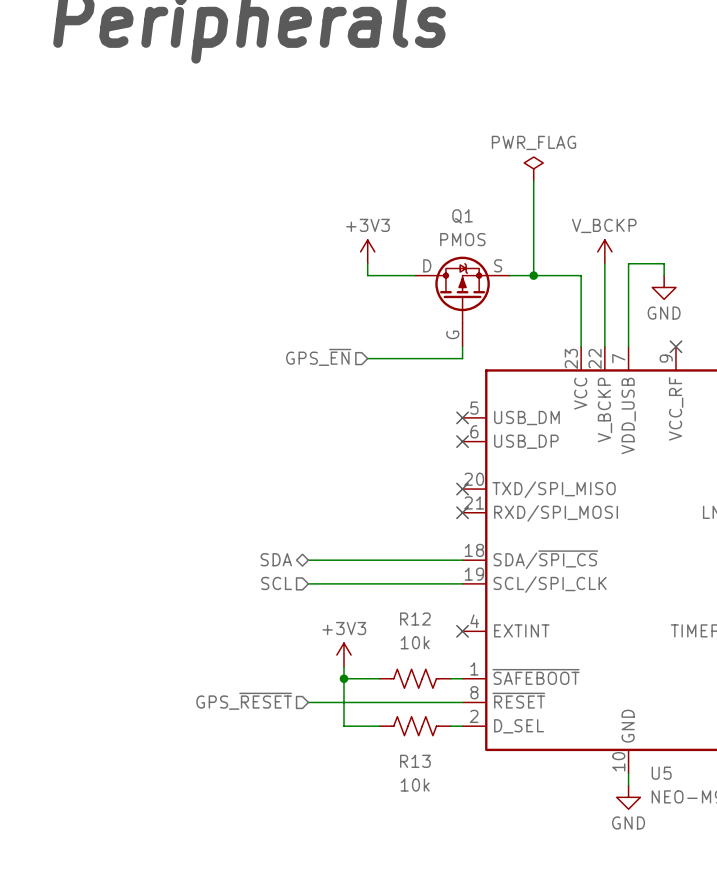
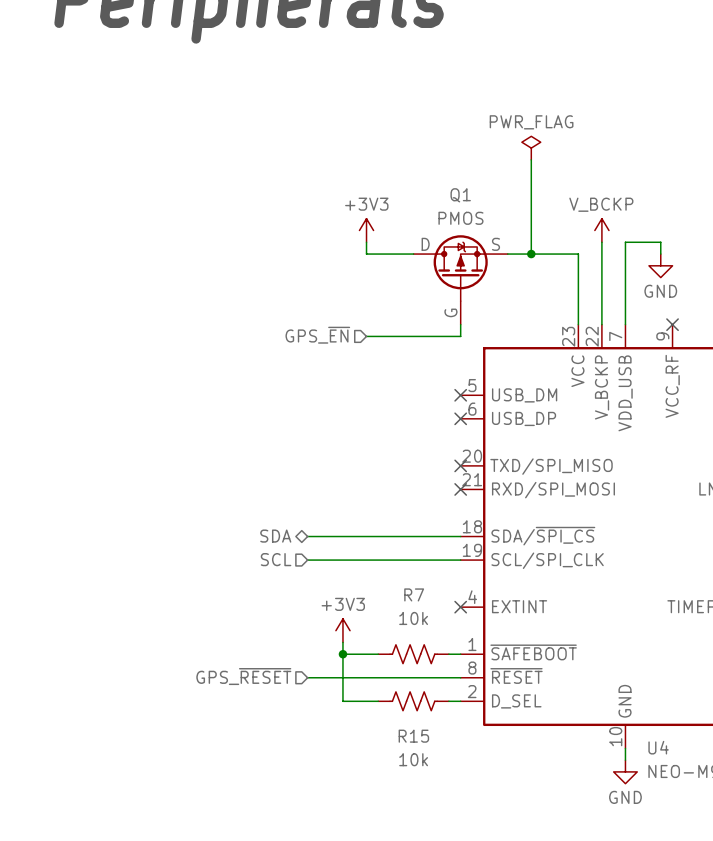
R12 name: R12 (415, 619) -> R7 (414, 594)
R13 name: R13 (415, 761) -> R15 (413, 736)
U5 name: U5 (661, 773) -> U4 (658, 747)

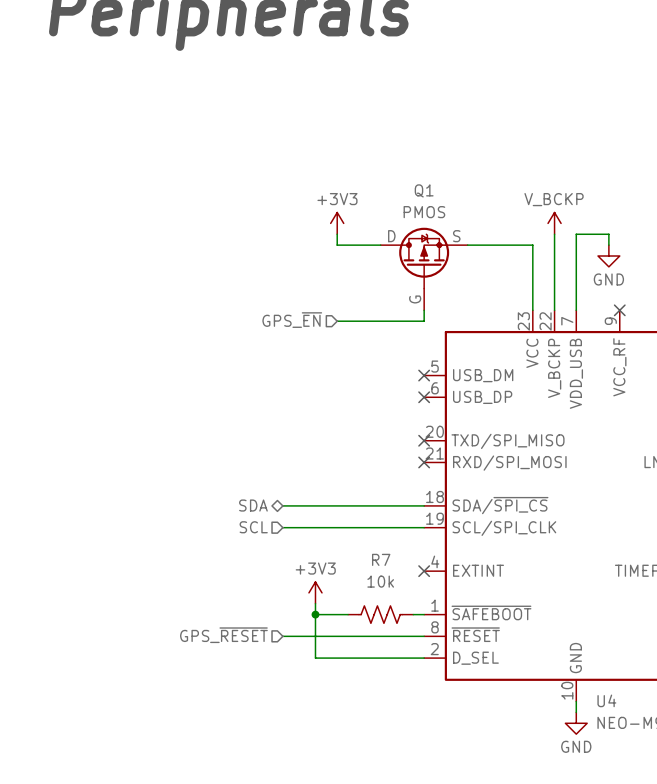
power symbol: PWR_FLAG (531, 148) -> none
wire: (531, 159) (531, 254) -> none
junction: (531, 254) -> none
R15: 10k (413, 701) -> none

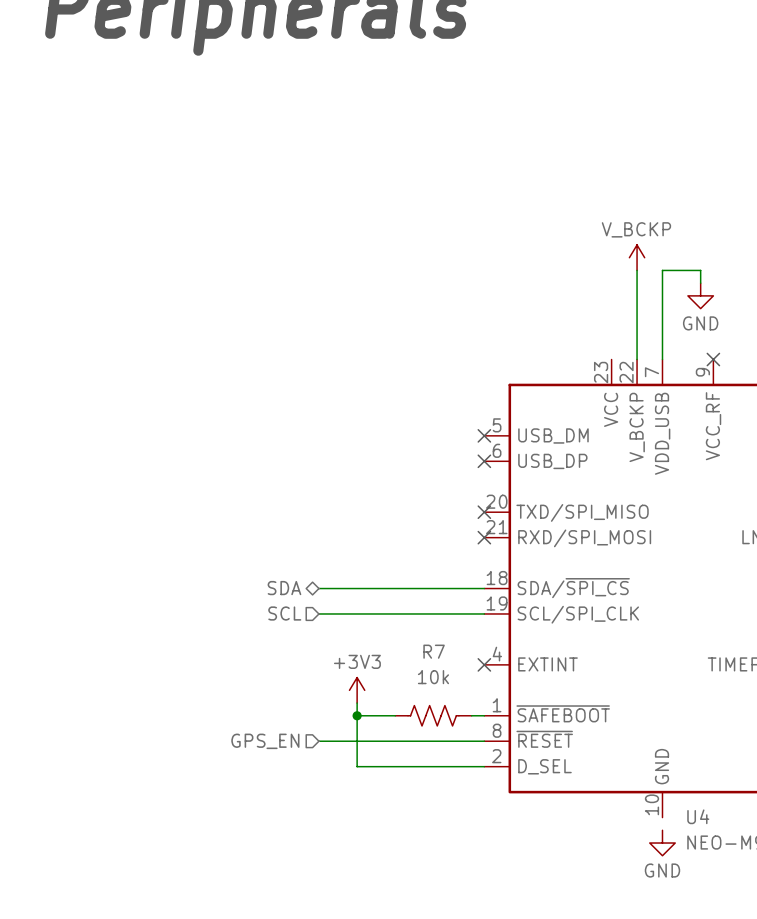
power symbol: +3V3 (337, 223) -> none
wire: (337, 234) (337, 245) (380, 245) -> none
wire: (467, 245) (532, 245) (532, 310) -> none
Q1: PMOS (424, 269) -> none
wire: (424, 310) (424, 321) (337, 321) -> none
hierarchical label: GPS_~{EN} (292, 320) -> none
hierarchical label: GPS_~{RESET} (223, 635) -> GPS_EN (265, 741)
wire: (576, 701) (576, 712) -> none

